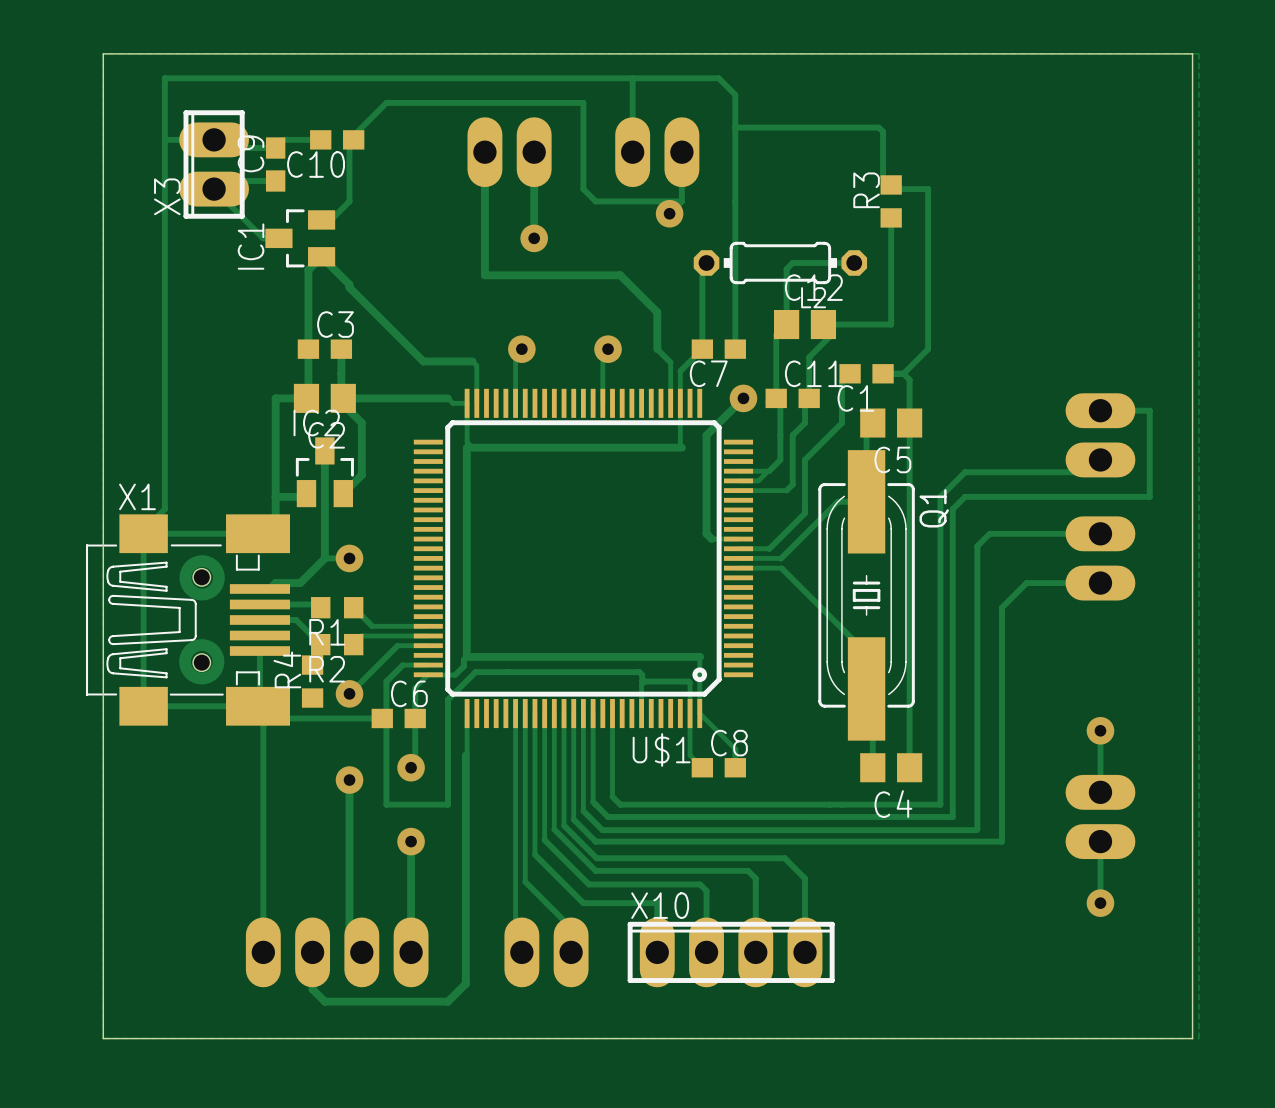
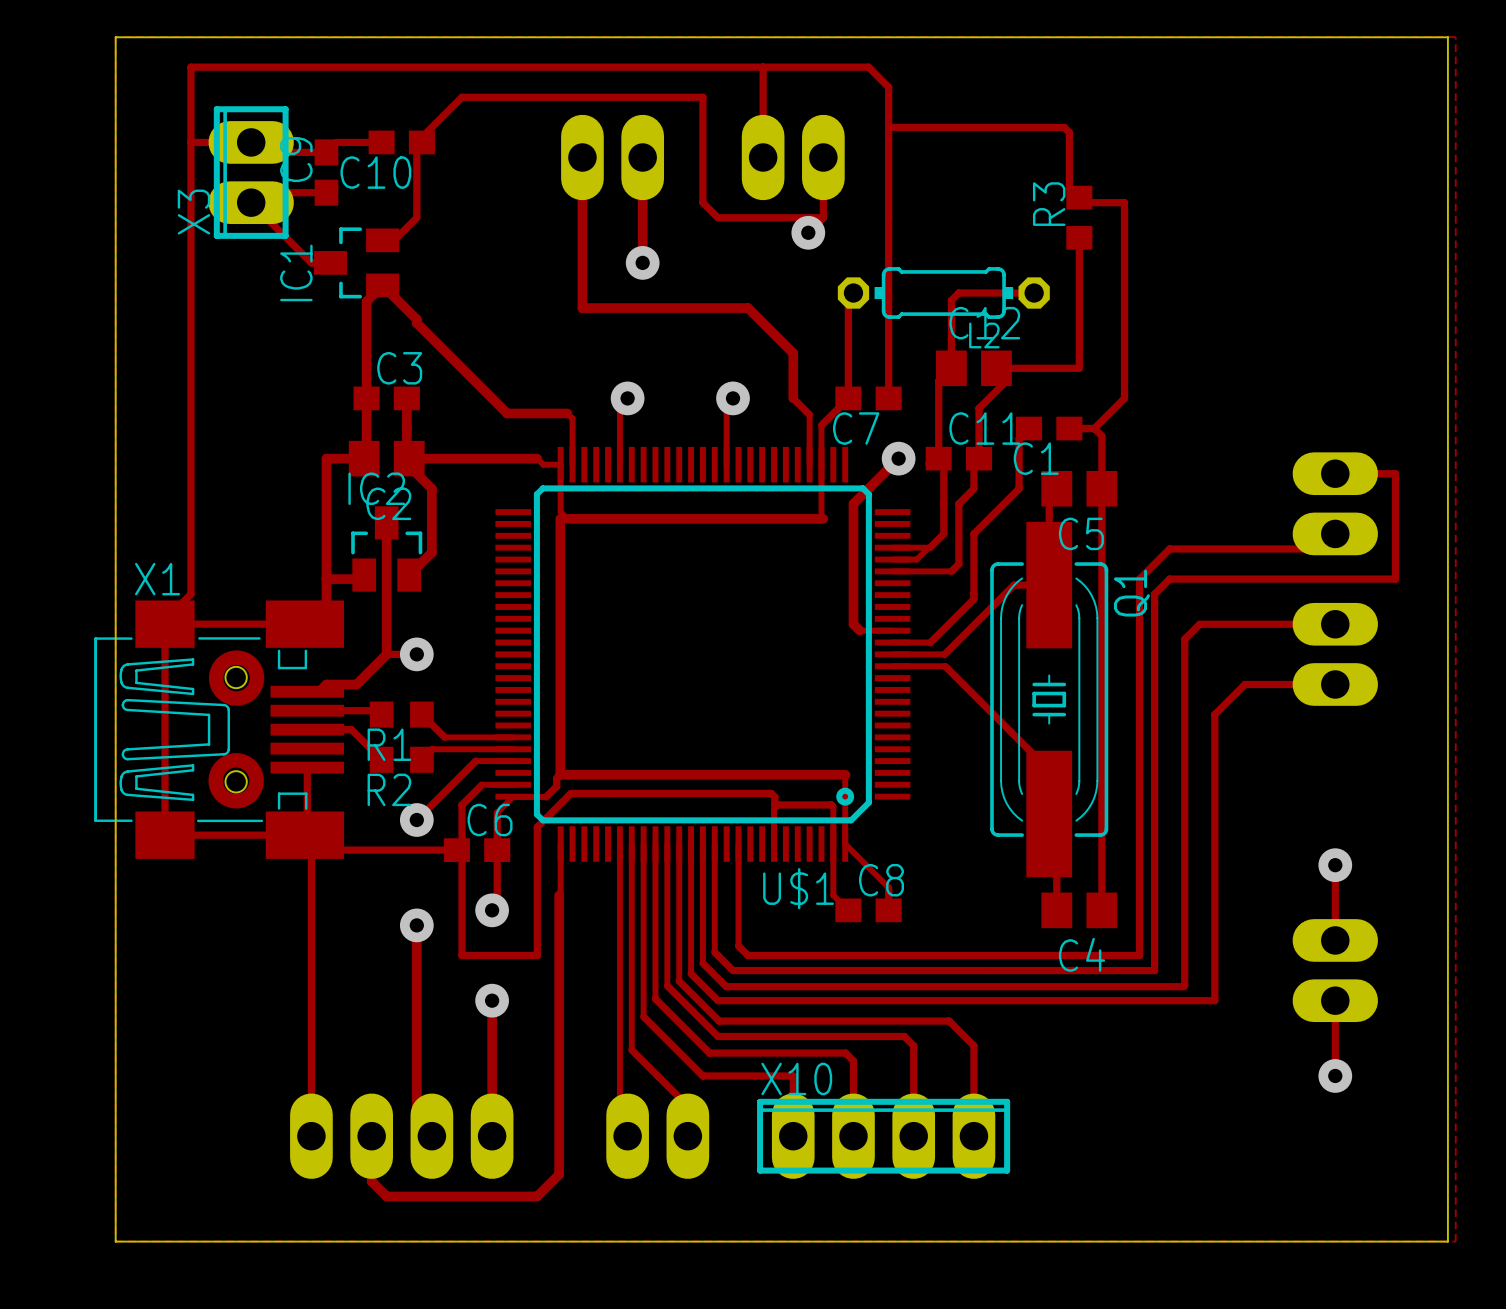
R4: (312, 681) -> none

